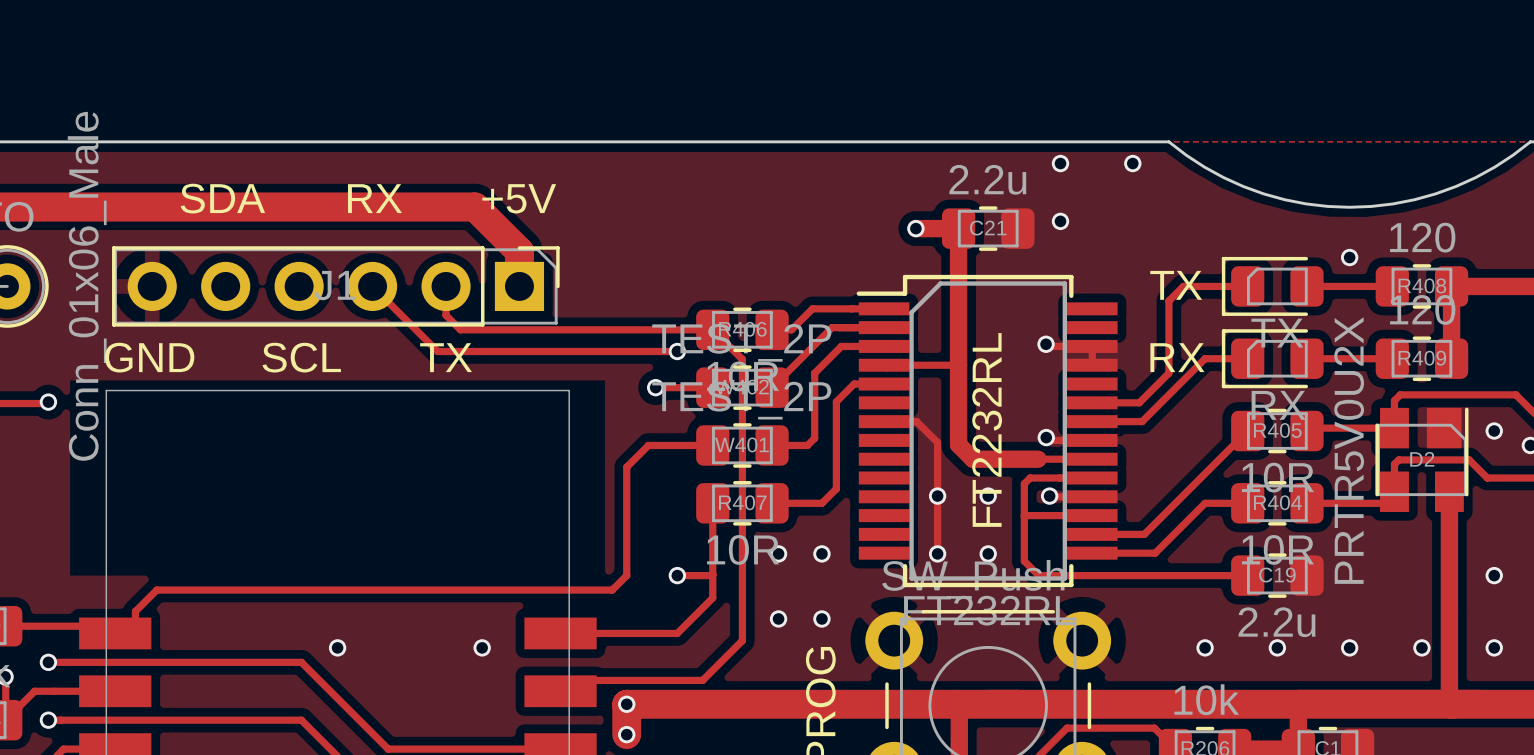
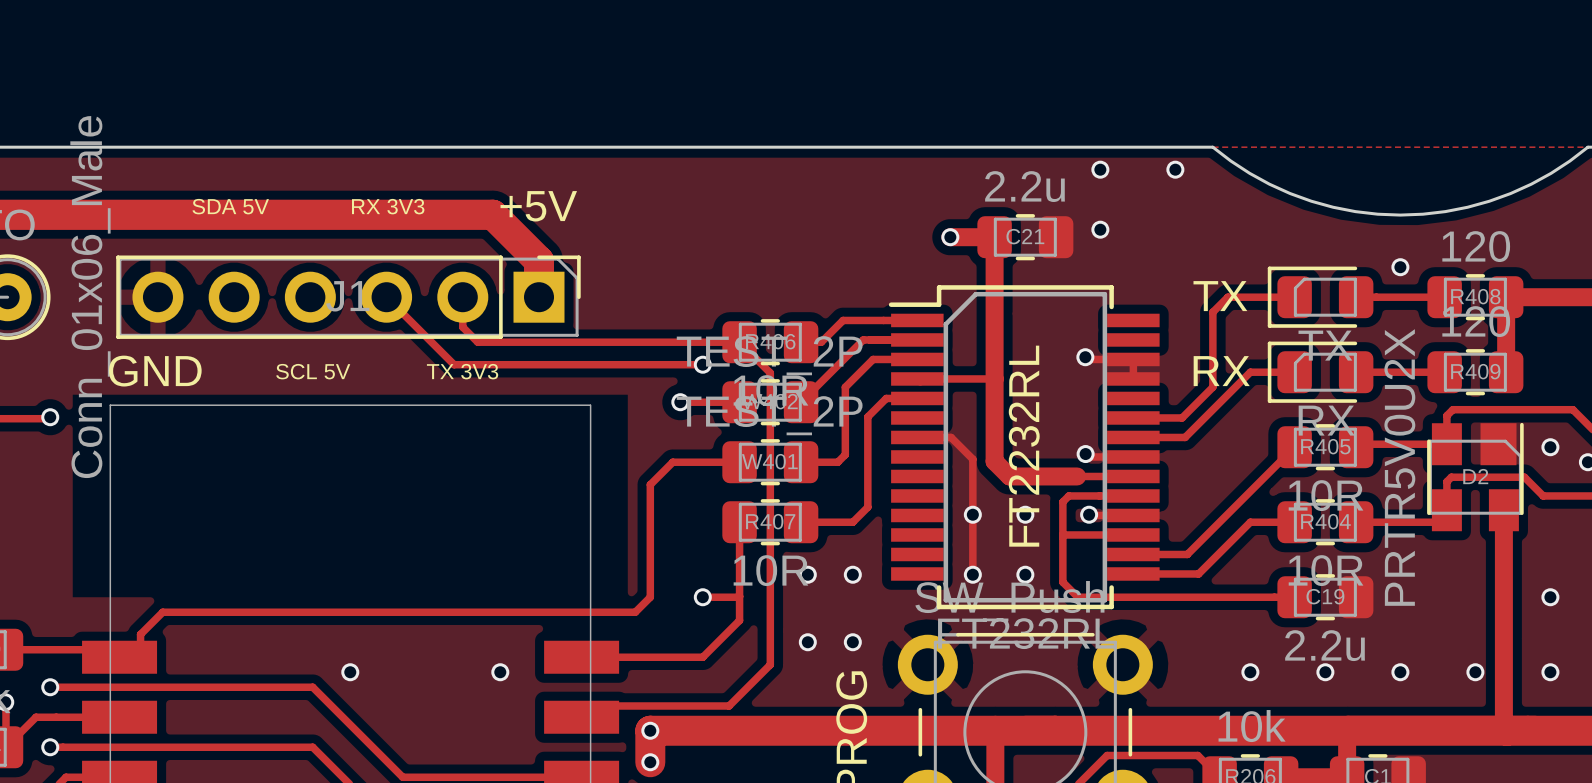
text: SDA (222, 198) -> SDA 5V (230, 206)
text: RX (375, 198) -> RX 3V3 (388, 206)
text: SCL (301, 357) -> SCL 5V (313, 371)
text: TX (446, 357) -> TX 3V3 (462, 371)

